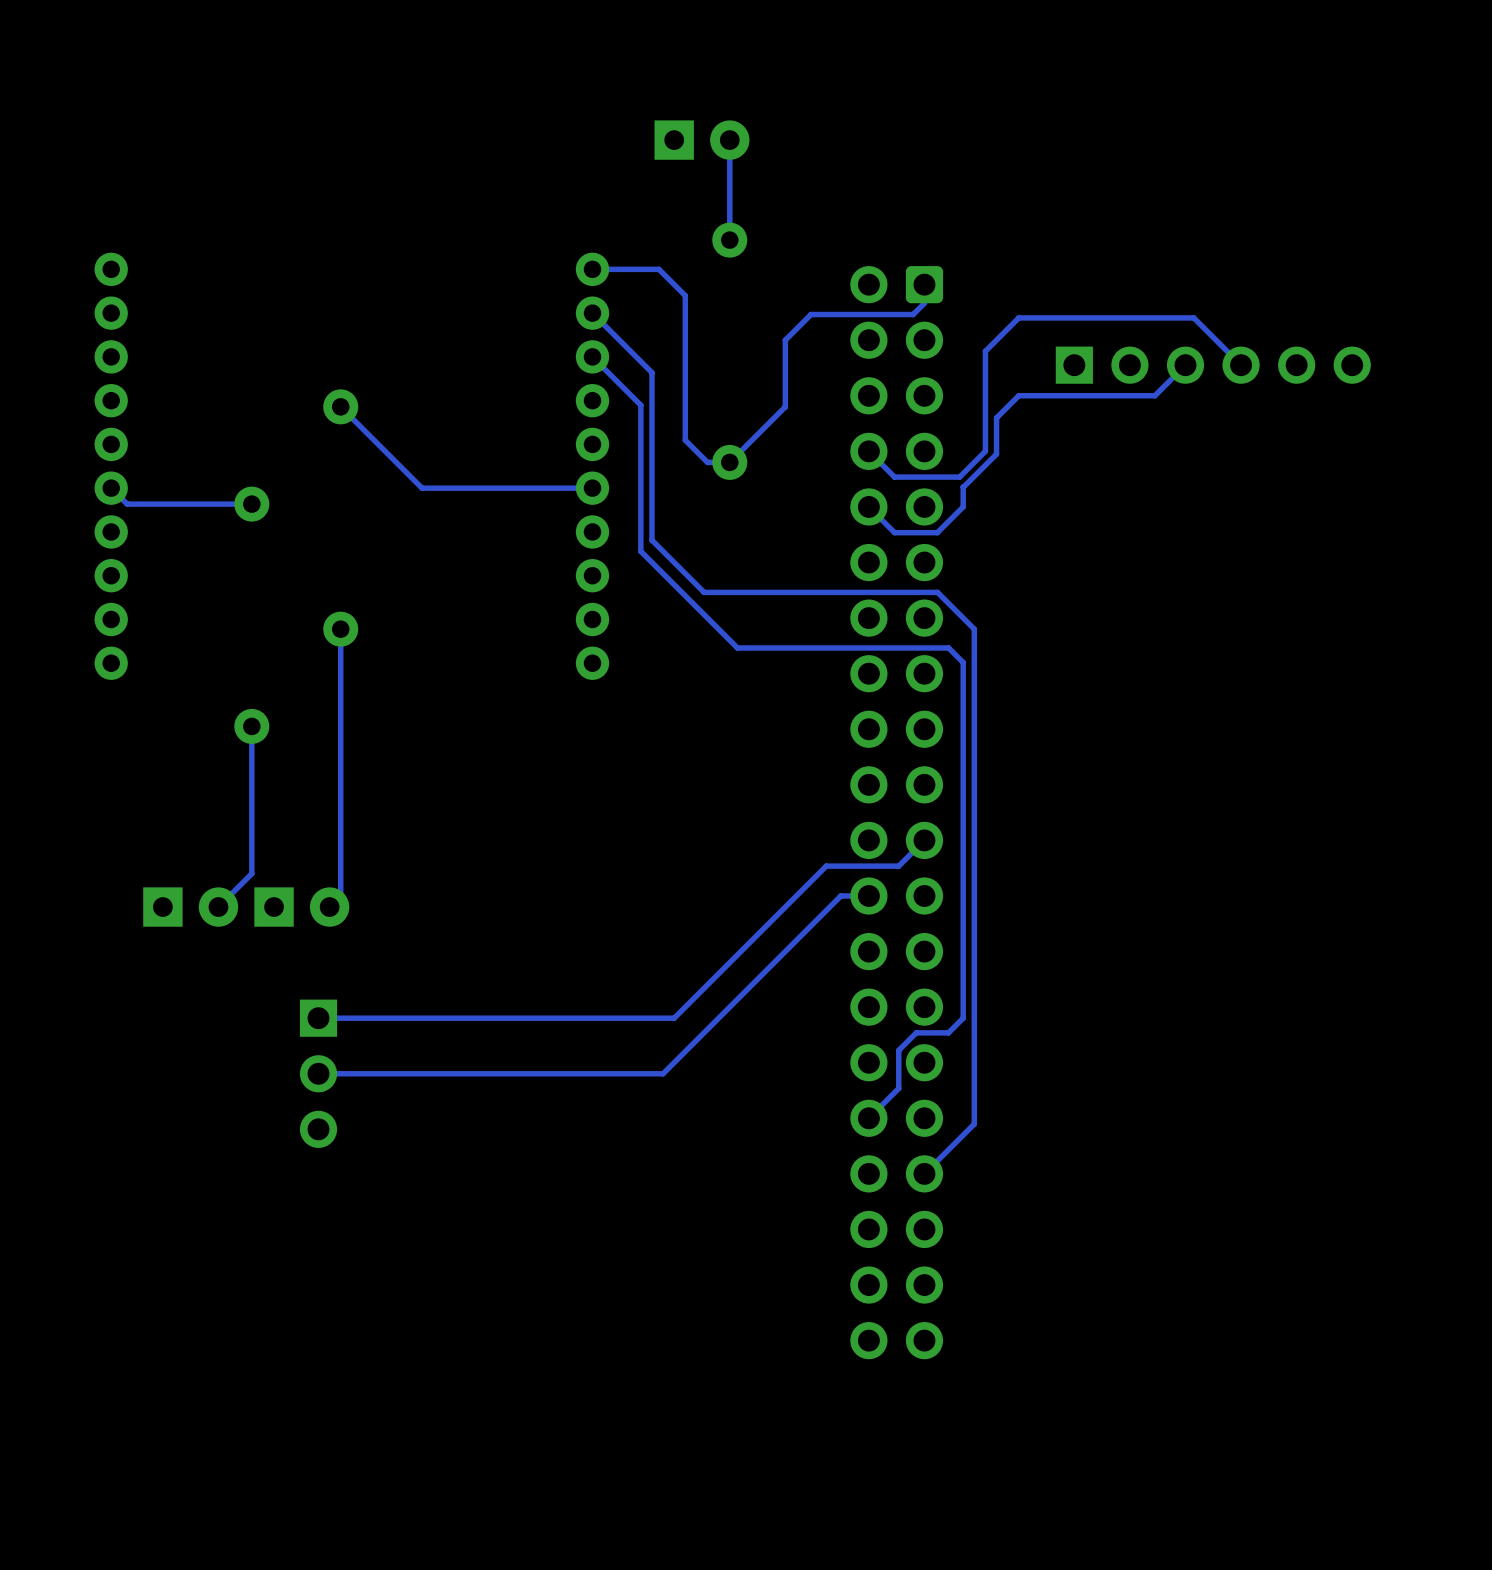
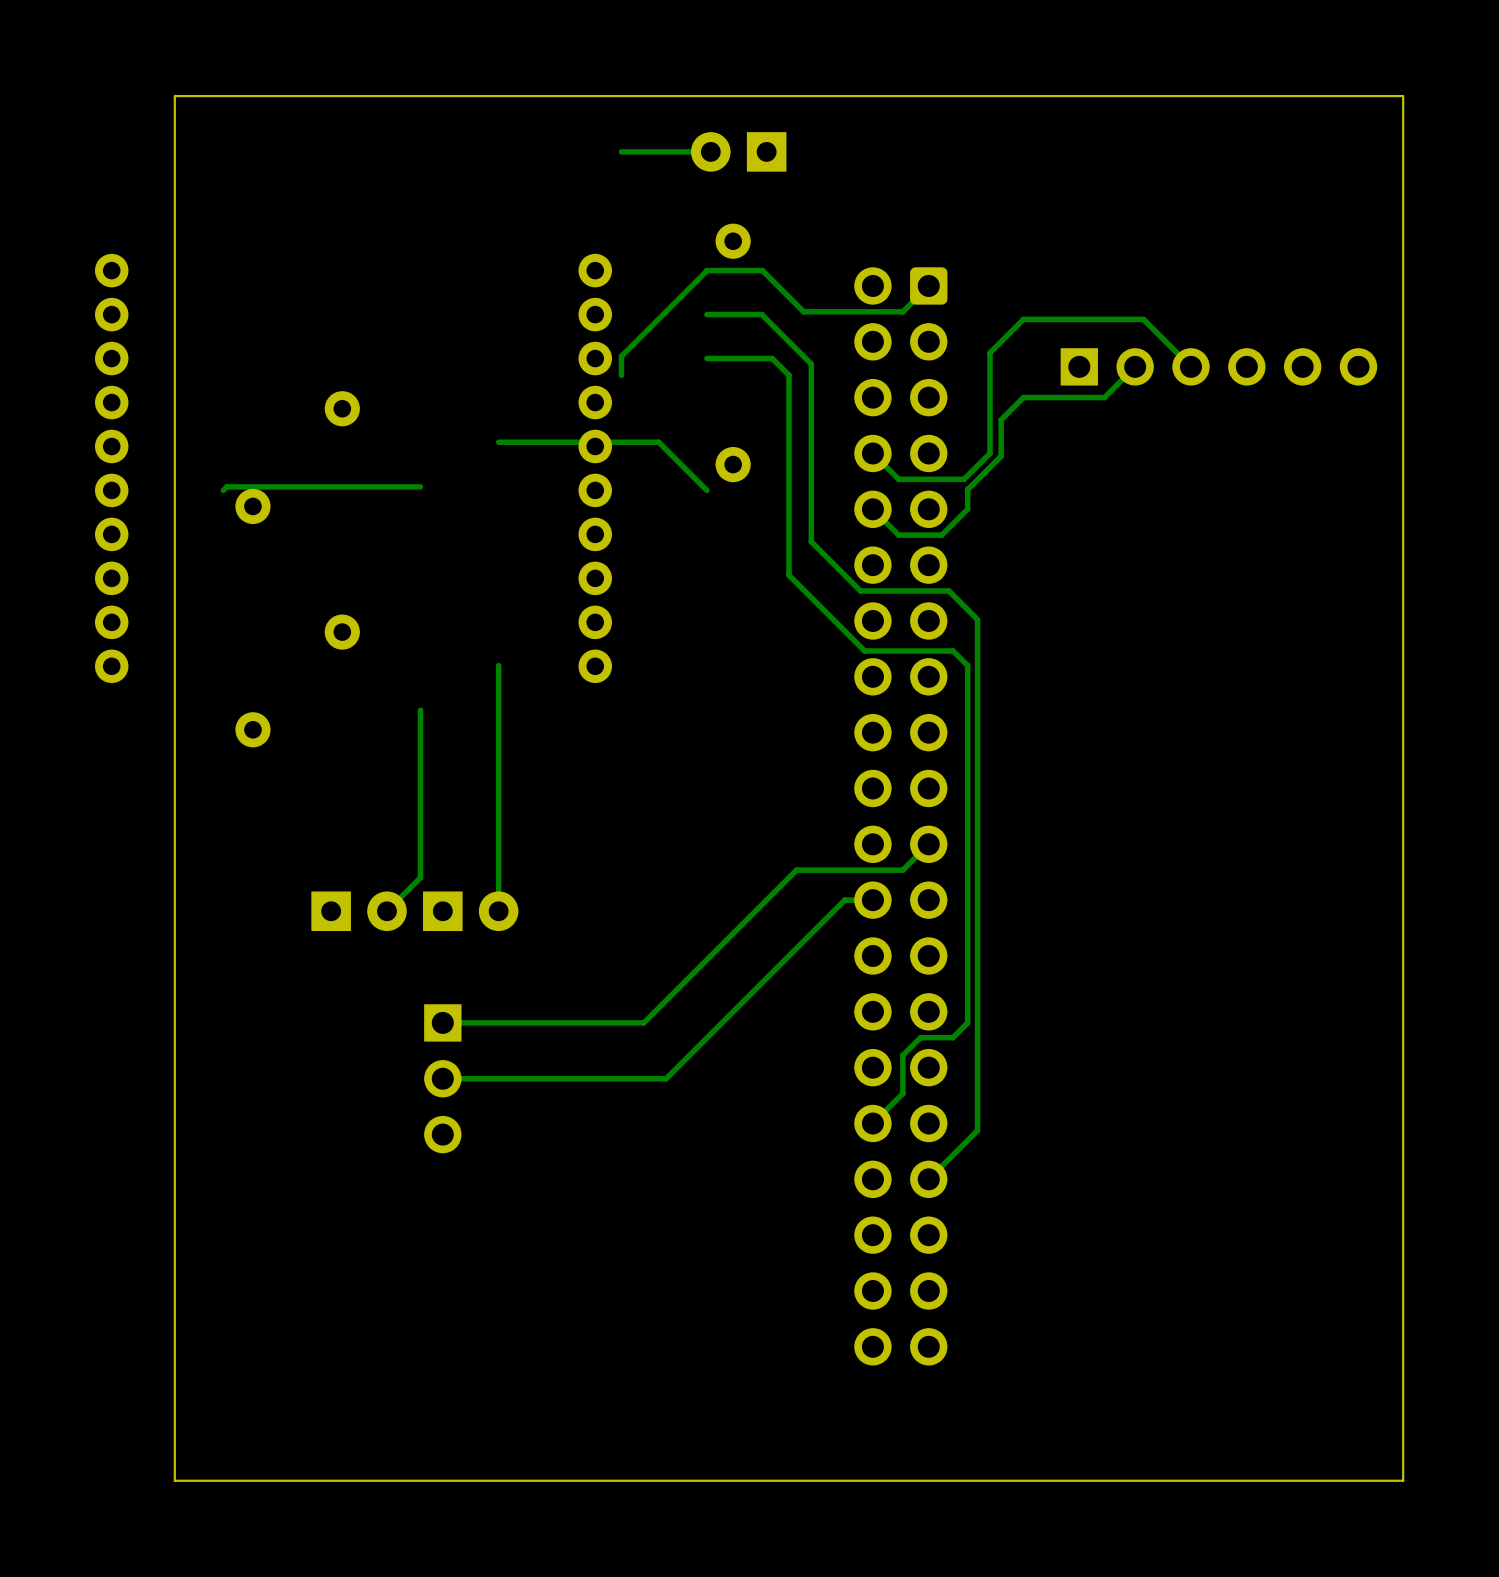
board edge: none -> (1403, 96) (174, 96) (174, 1480) (1403, 1480) (1403, 96)
part rotation: 0° (701, 140) -> 180° (738, 151)
track: (729, 140) (729, 240) -> none
track: none -> (710, 151) (621, 151)
track: (592, 269) (658, 269) (685, 295) (685, 440) (707, 462) (729, 462) (785, 406) -> none
track: none -> (706, 270) (621, 356) (621, 375)
track: (924, 284) (924, 303) (913, 314) (810, 314) (785, 340) (785, 373) -> (928, 285) (902, 311) (803, 311) (762, 270) (706, 270)
track: (592, 313) (651, 372) (651, 540) (704, 592) (937, 592) (974, 629) (973, 1125) -> (706, 314) (761, 314) (811, 364) (811, 541) (860, 590) (948, 590) (977, 619) (977, 1130)
track: (1138, 317) (1193, 317) (1241, 365) -> (1143, 319) (1191, 366)
track: (592, 356) (640, 405) (640, 551) (737, 647) (860, 647) -> (788, 408) (788, 575) (864, 650)
track: none -> (706, 358) (772, 358) (788, 375)
track: (1185, 365) (1154, 395) (1099, 395) -> (1135, 366) (1104, 397)
track: (340, 406) (422, 488) (592, 488) -> none
track: none -> (498, 442) (658, 442) (706, 490)
track: none -> (420, 486) (226, 486) (223, 490)
track: (111, 488) (127, 504) (251, 504) -> none
track: (340, 629) (340, 895) (329, 907) -> none
track: none -> (498, 665) (498, 911)
track: none -> (420, 710) (420, 877) (386, 911)
track: (251, 726) (251, 873) (218, 907) -> none
track: (826, 866) (674, 1018) (640, 1018) -> (830, 870) (796, 870) (643, 1022)
part: (190, 907) -> none
part position: (301, 907) -> (359, 911)
part: none -> (470, 911)
track: (440, 1018) (318, 1018) -> none
part position: (318, 1073) -> (442, 1078)
track: (440, 1073) (318, 1073) -> none

